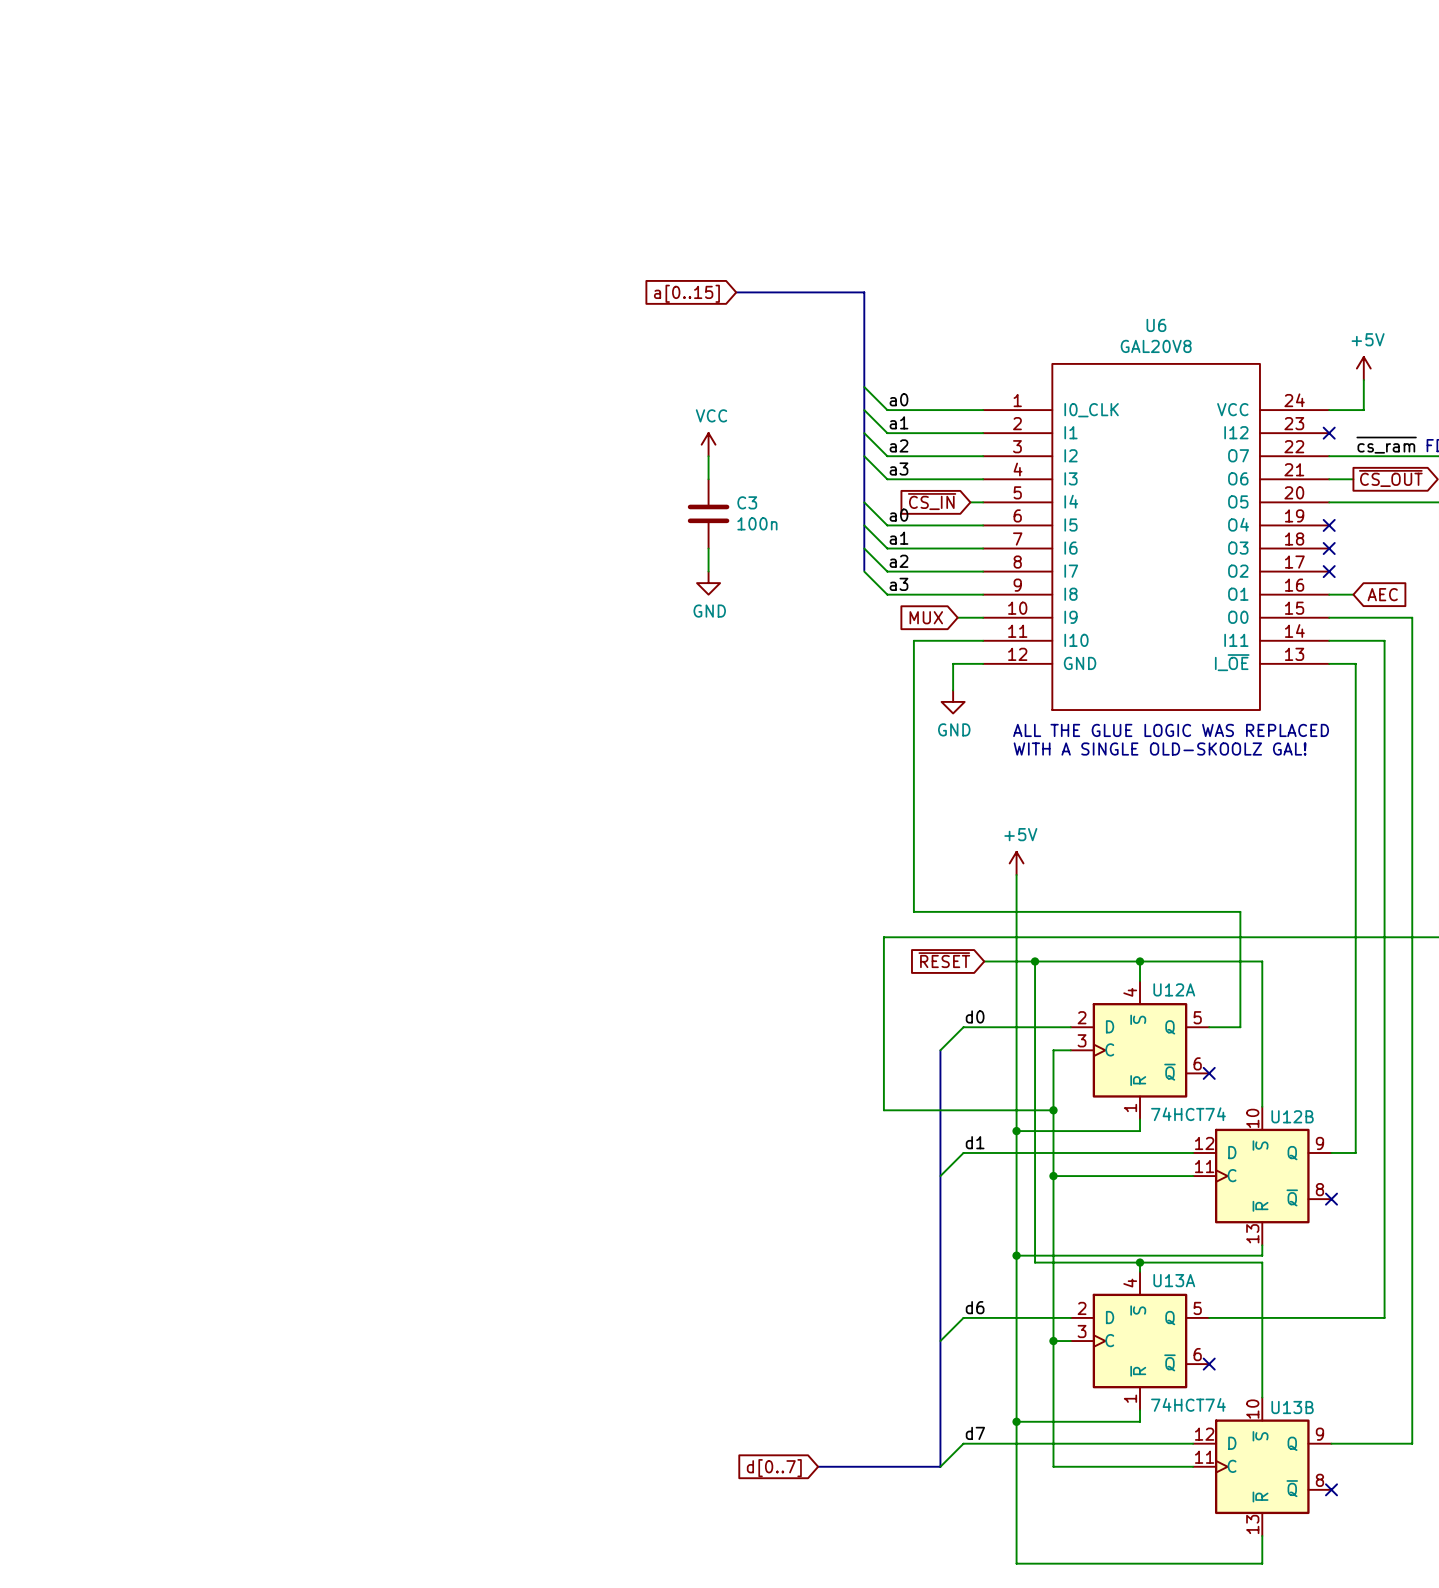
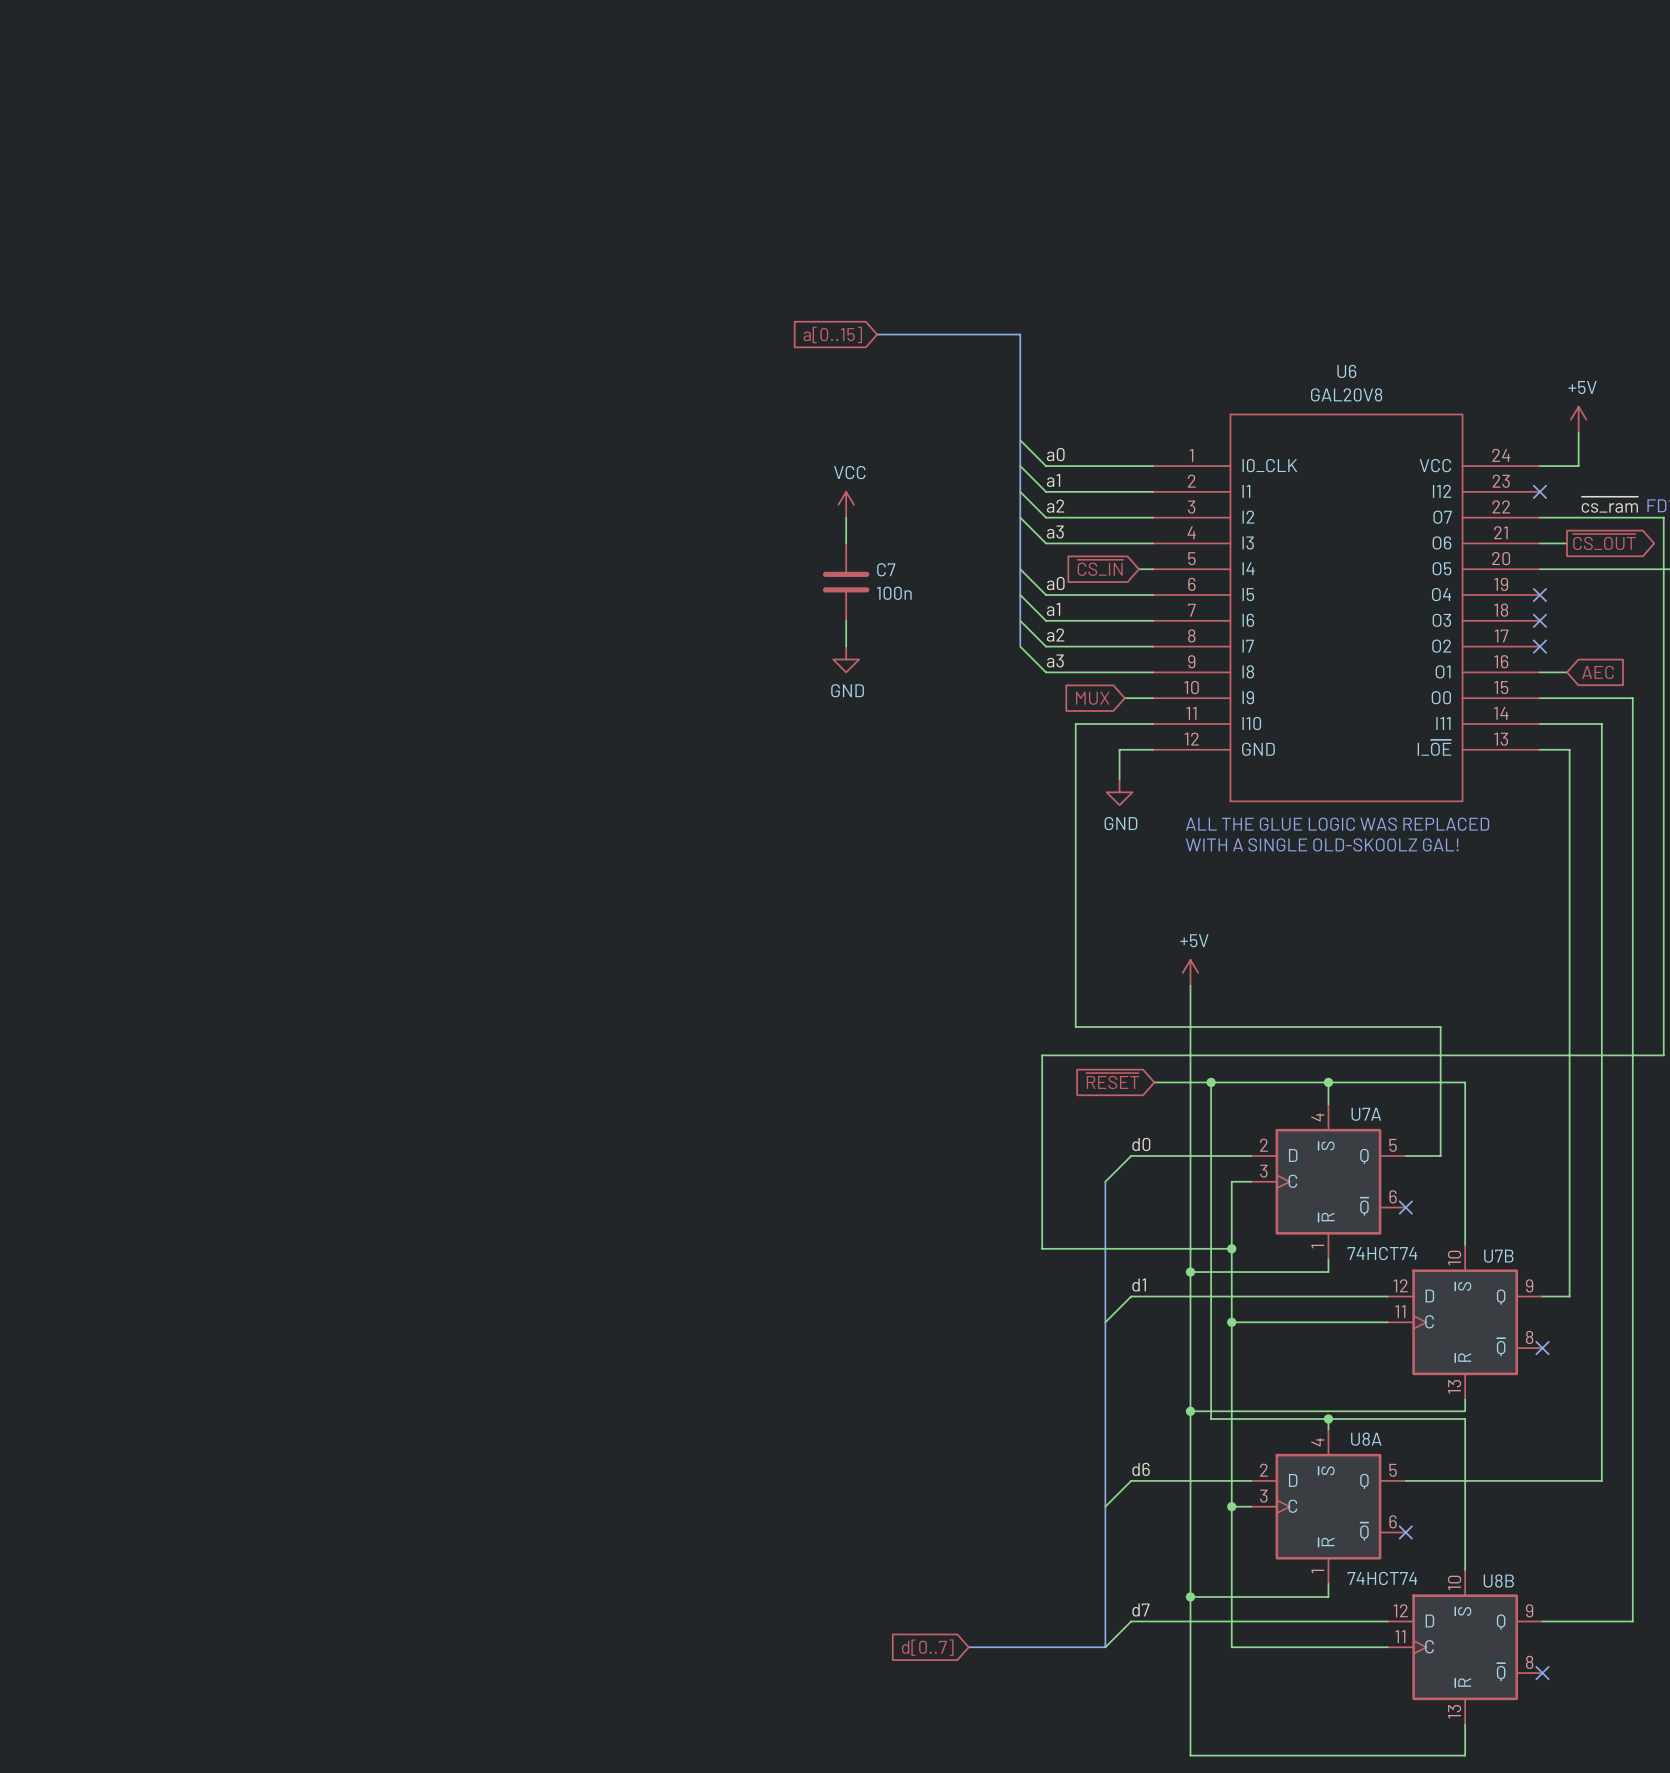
C3 name: C3 (747, 502) -> C7 (886, 569)
U12A name: U12A (1174, 989) -> U7A (1366, 1114)
U12B name: U12B (1292, 1116) -> U7B (1498, 1256)
U13A name: U13A (1174, 1280) -> U8A (1366, 1439)
U13B name: U13B (1292, 1407) -> U8B (1498, 1581)

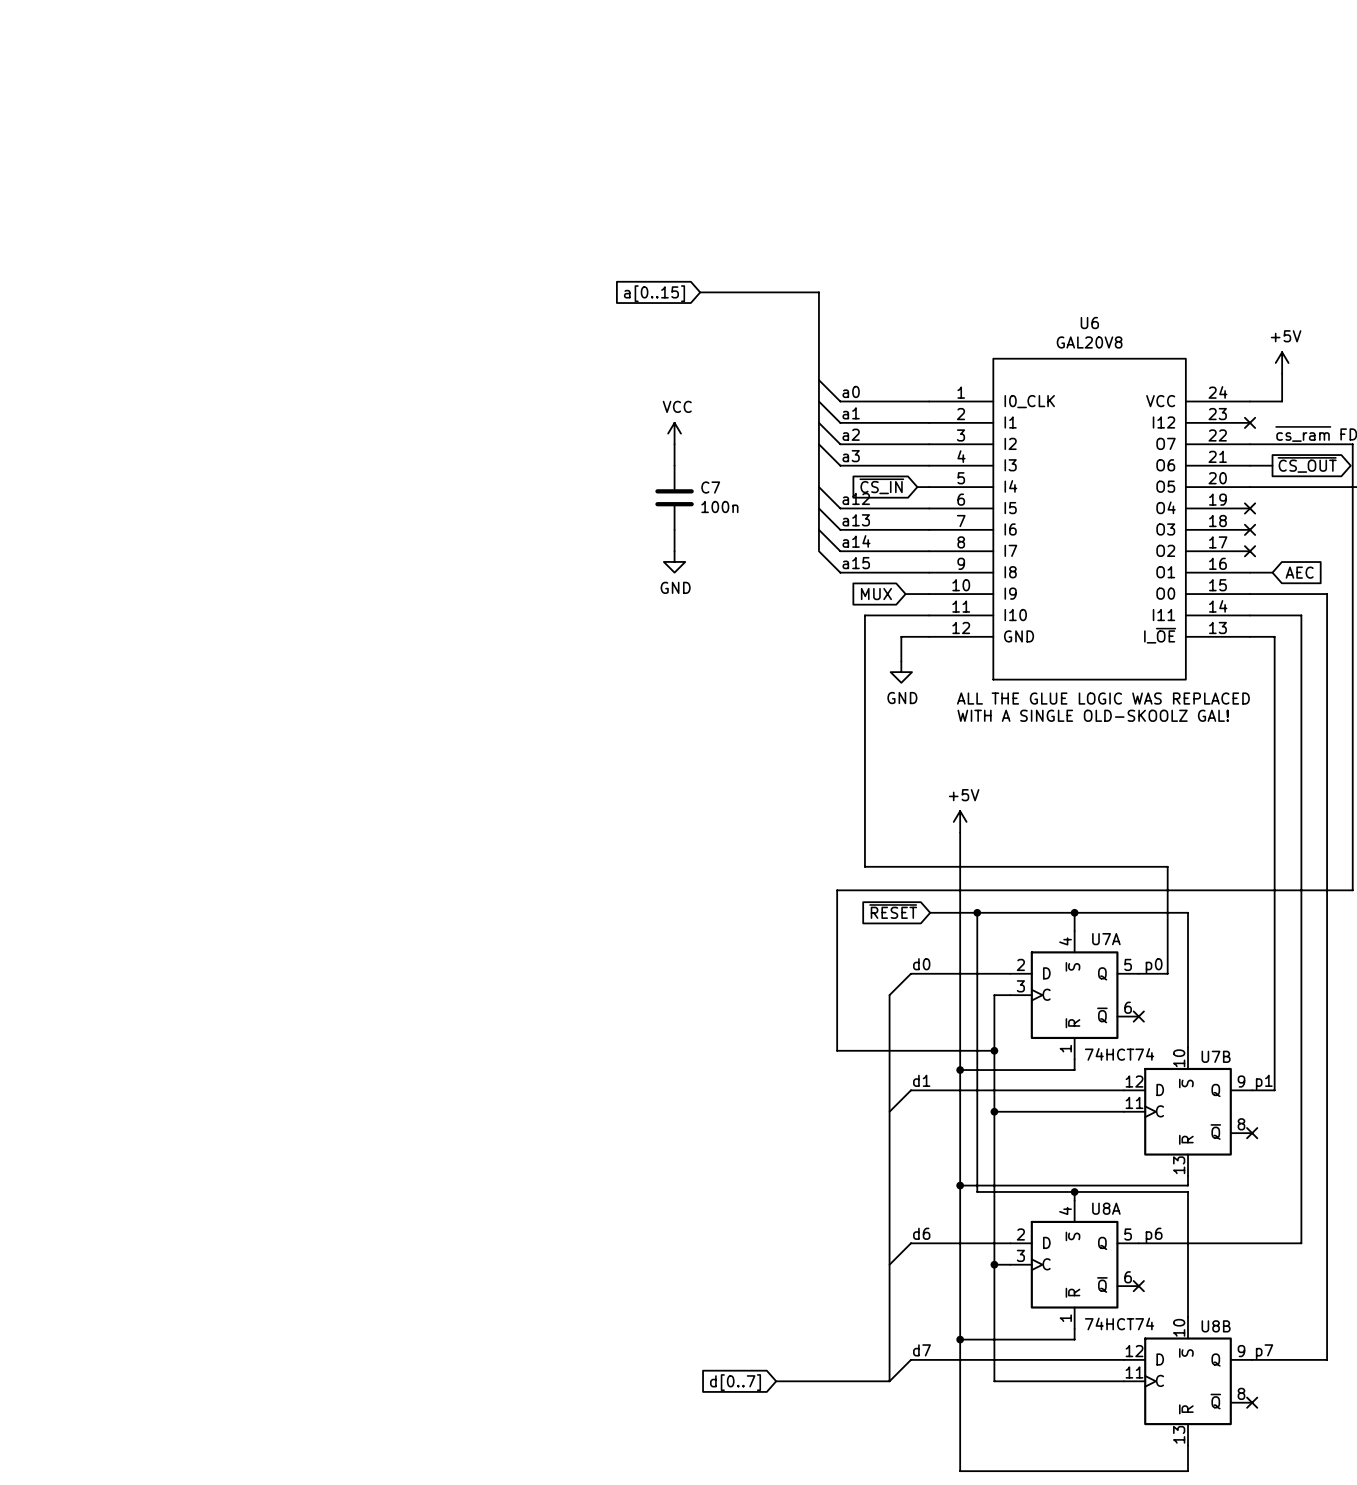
label: a0 (1055, 583) -> a12 (856, 498)
label: a1 (1053, 609) -> a13 (856, 520)
label: a2 (1055, 635) -> a14 (856, 541)
label: a3 (1055, 660) -> a15 (856, 563)
label: none -> p0 (1154, 966)
label: none -> p1 (1264, 1082)
label: none -> p6 (1154, 1235)
label: none -> p7 (1264, 1352)

